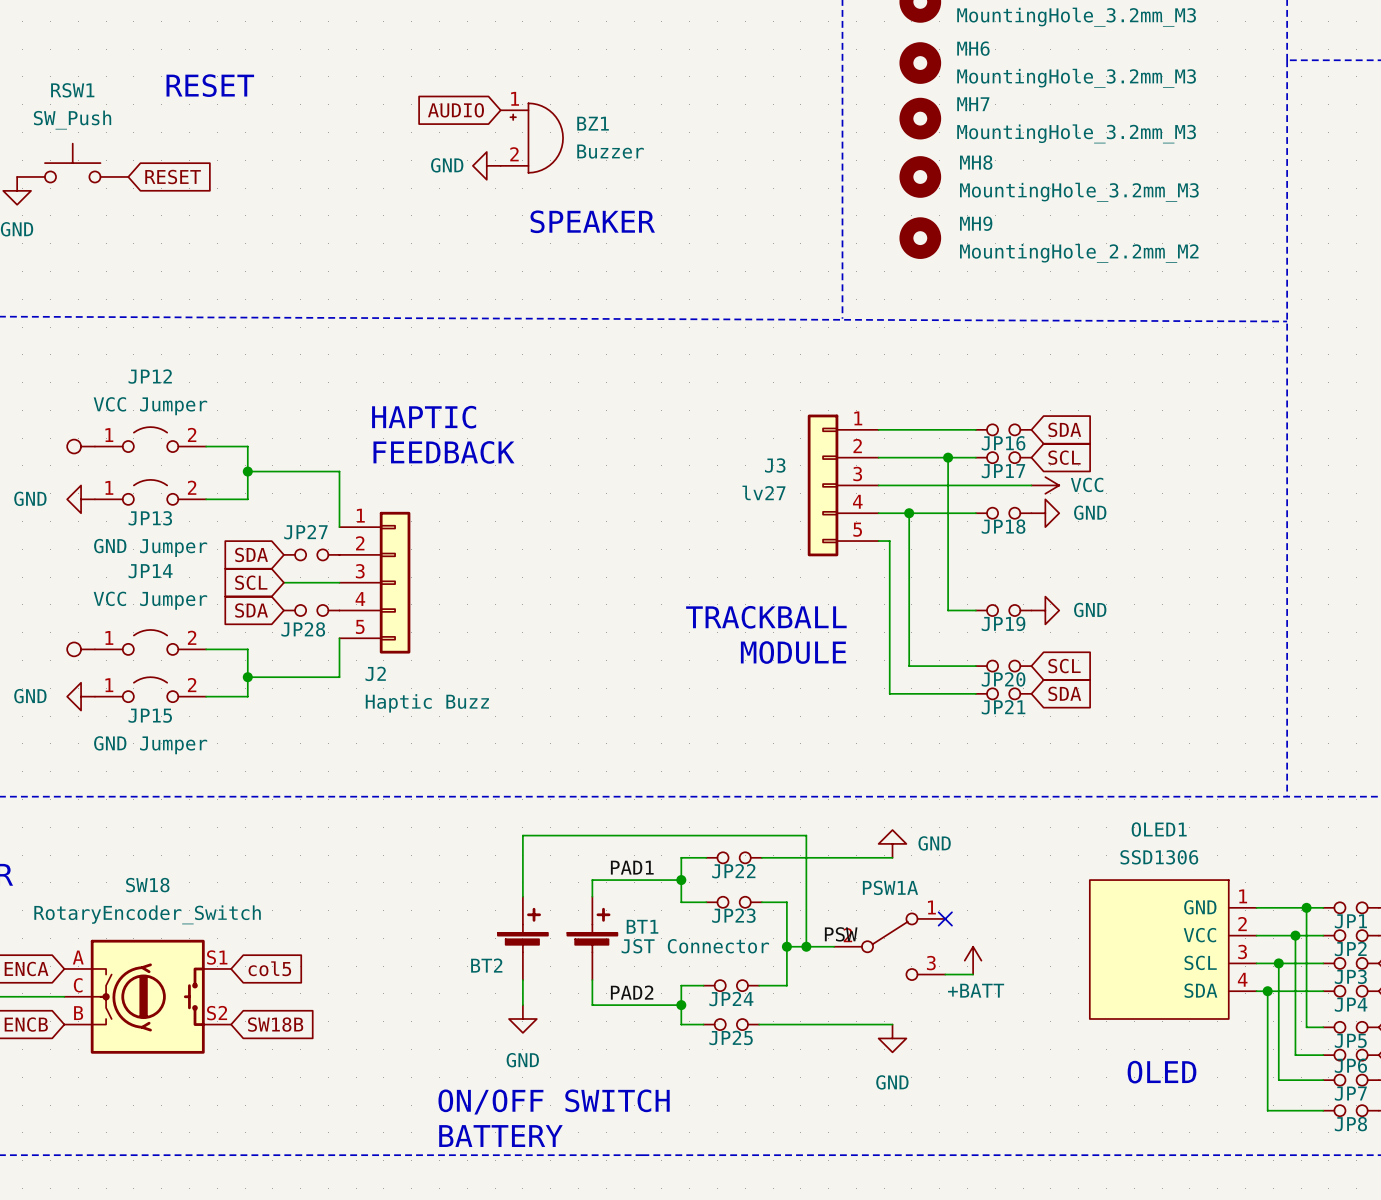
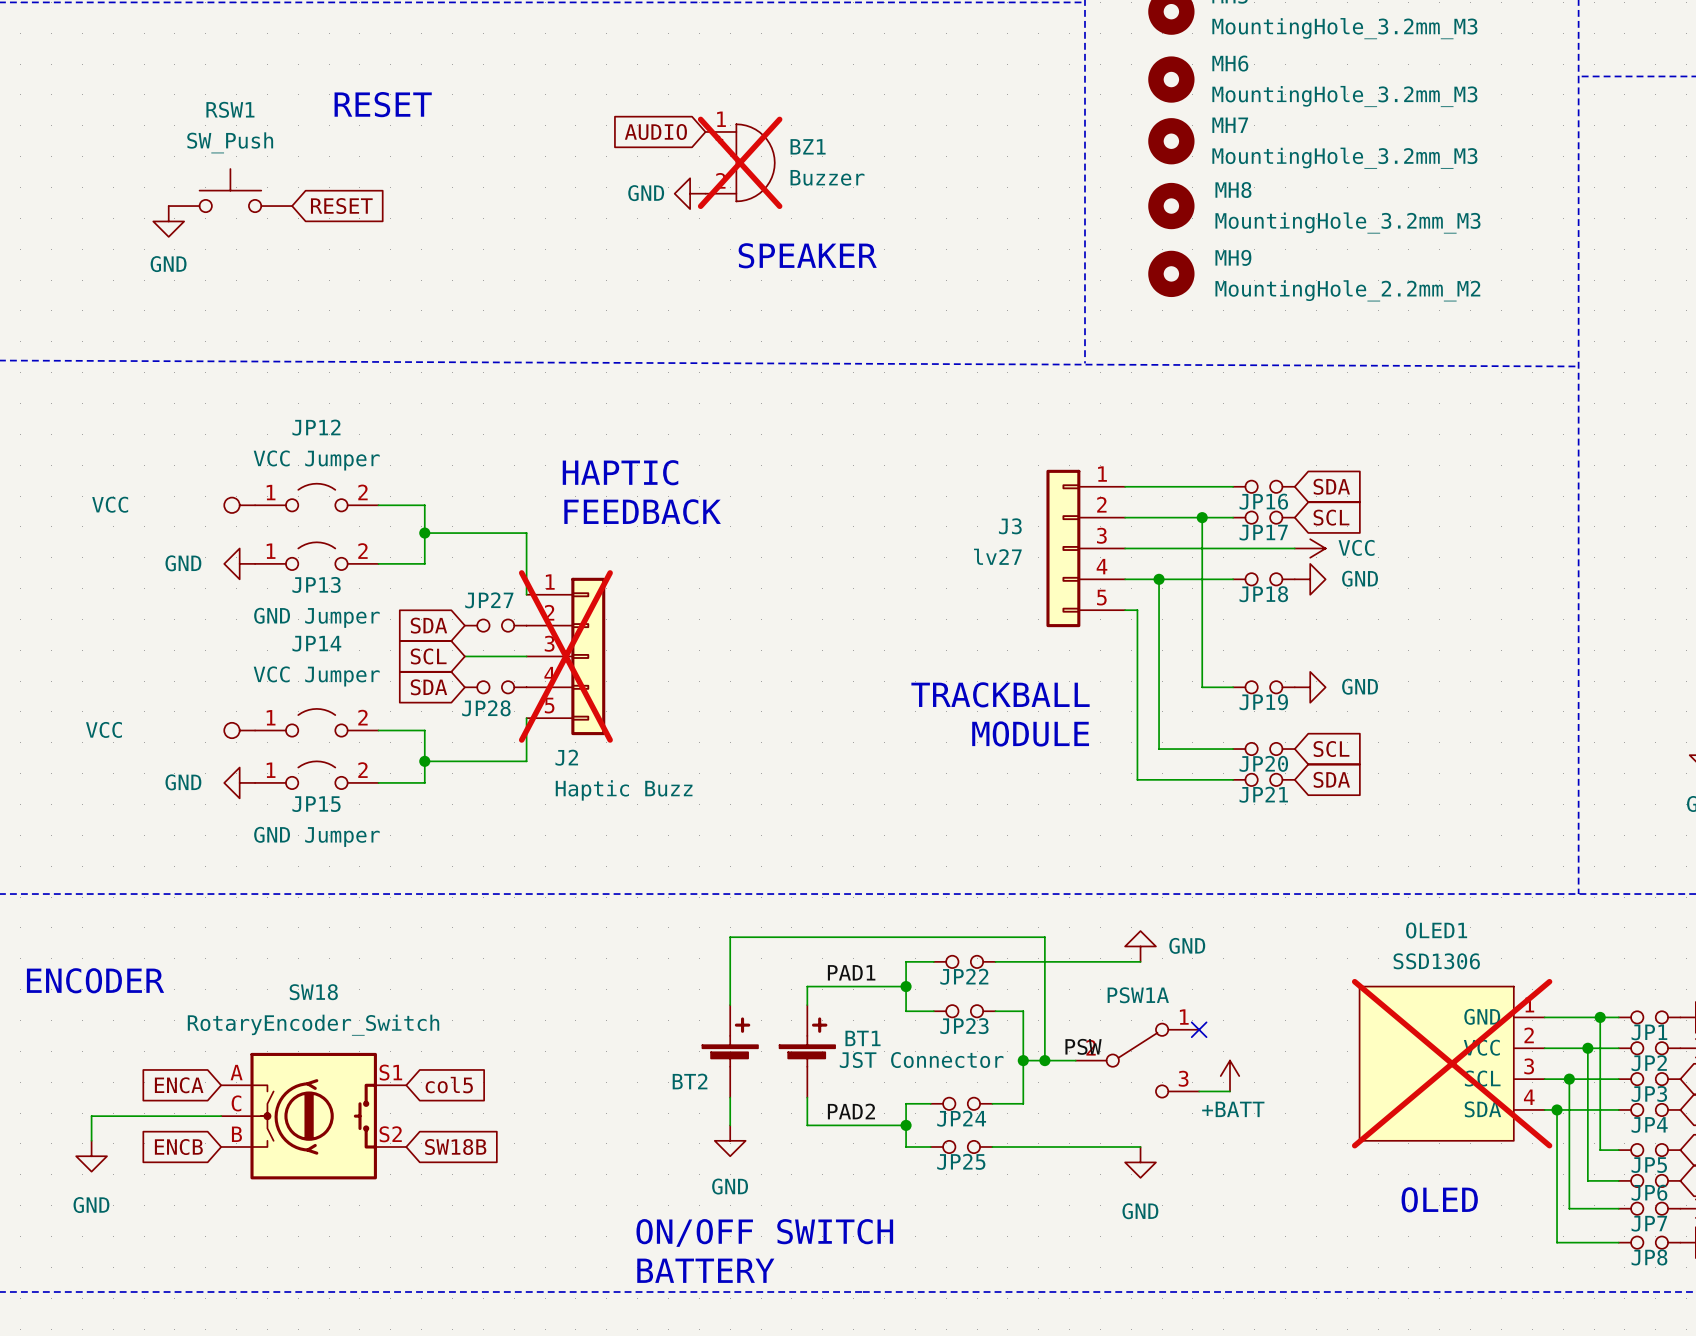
BZ1 do-not-place cross: none -> (740, 162)
J2 do-not-place cross: none -> (565, 656)
OLED1 do-not-place cross: none -> (1452, 1063)

